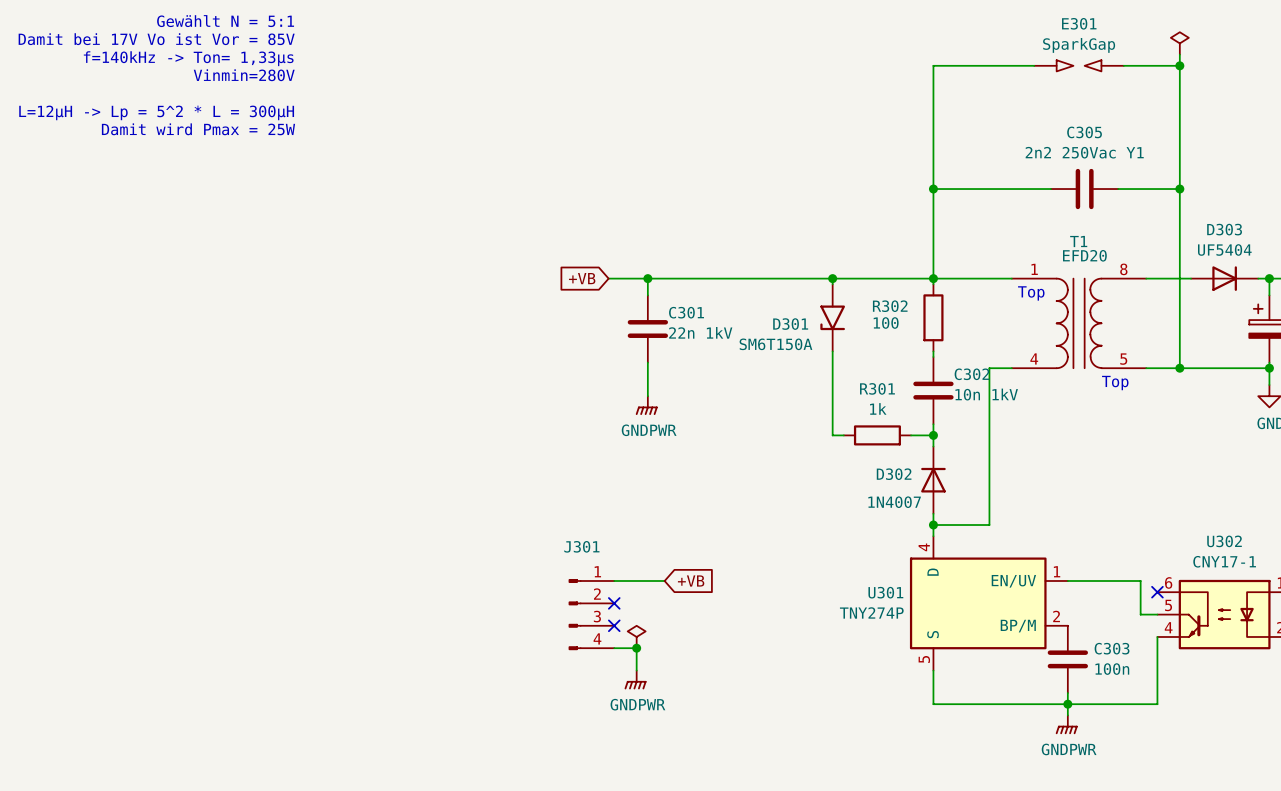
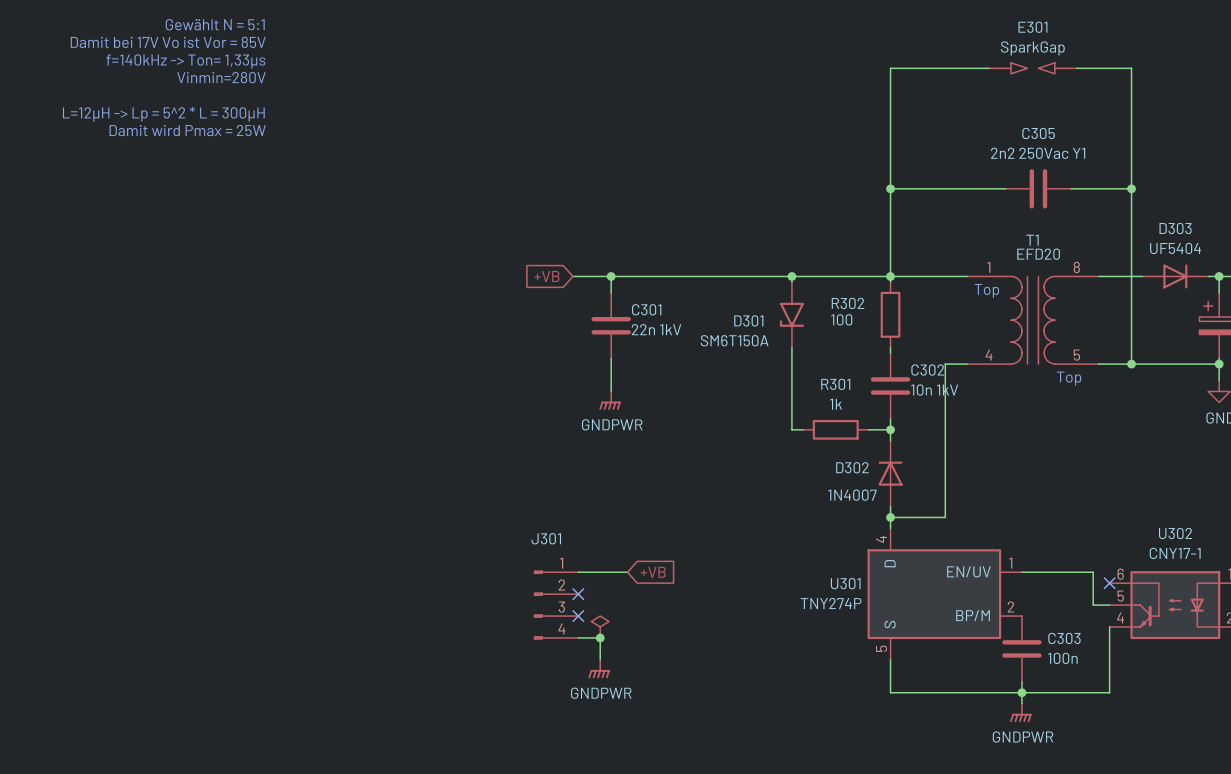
power symbol: (1179, 43) -> none
wire: (1179, 54) (1179, 65) -> none
junction: (1179, 65) -> none

